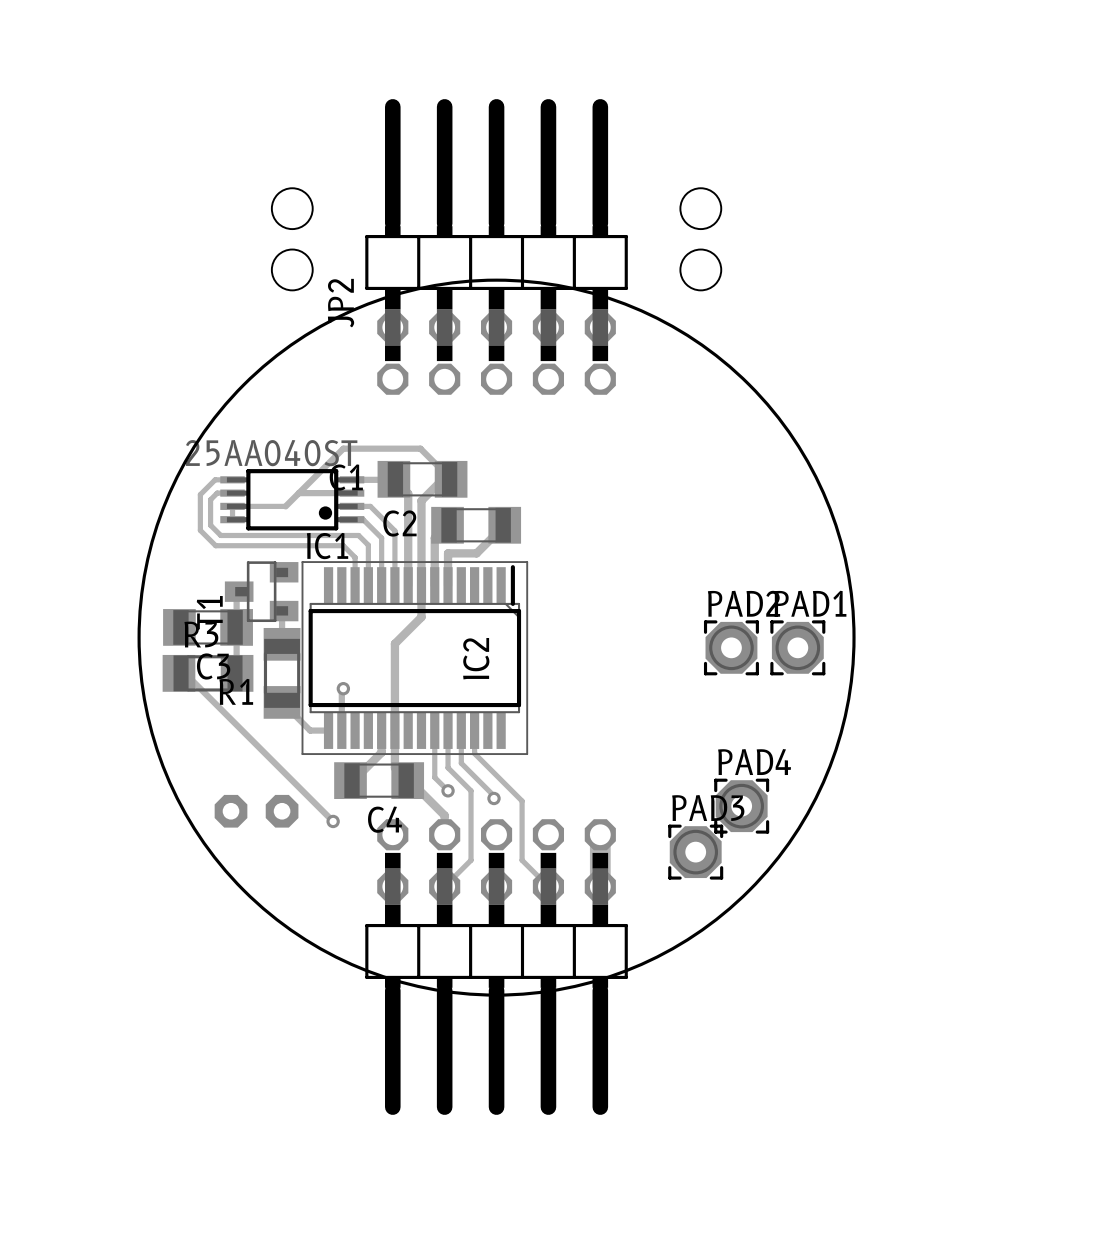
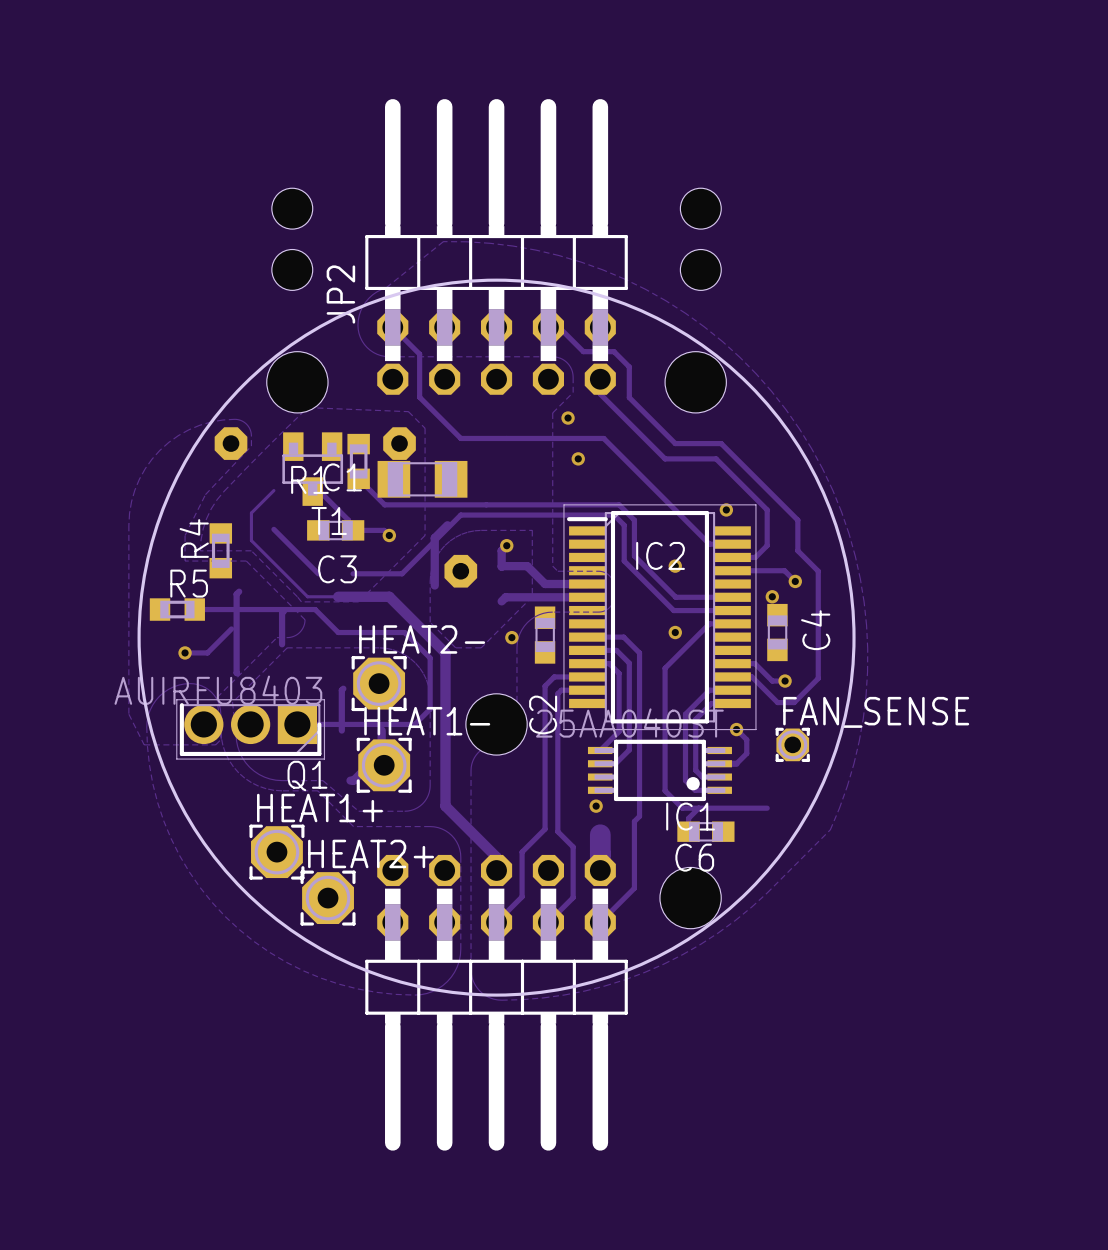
zone outline: none -> (443, 241) (513, 246) (581, 262) (645, 289) (685, 313) (722, 341) (771, 391) (811, 448) (832, 490) (849, 533) (864, 602) (867, 671) (863, 718) (853, 764) (830, 829) (751, 907) (700, 944) (644, 972) (605, 985) (564, 995) (522, 999) (497, 999) (483, 993) (473, 981) (471, 969) (471, 767) (474, 757) (481, 750) (489, 745) (506, 742) (515, 732) (517, 643) (524, 626) (534, 616) (548, 612) (604, 610) (612, 602) (613, 584) (610, 577) (602, 571) (557, 571) (552, 566) (552, 412) (573, 392) (572, 371) (567, 362) (560, 358) (552, 356) (385, 356) (370, 350) (362, 341) (358, 329) (358, 320) (365, 301) (443, 241)
track: none -> (392, 327) (419, 354) (419, 397) (460, 438) (603, 438) (709, 544) (732, 544)
track: none -> (548, 327) (559, 327) (583, 351) (614, 351) (629, 366) (629, 397) (675, 443) (721, 443) (797, 520) (797, 550) (818, 571) (818, 678) (794, 702) (777, 702) (751, 676) (732, 676)
track: none -> (600, 379) (600, 394) (665, 458) (716, 458) (767, 509) (767, 545) (755, 557) (732, 557)
hole: none -> (297, 382)
hole: none -> (695, 382)
zone outline: none -> (307, 407) (217, 499) (206, 518) (200, 550) (251, 550) (301, 601) (358, 601) (425, 535) (425, 428) (408, 411) (307, 407)
via: none -> (568, 418)
zone outline: none -> (234, 419) (243, 421) (249, 427) (251, 446) (205, 494) (185, 535) (185, 561) (246, 561) (305, 619) (304, 624) (301, 630) (294, 636) (276, 637) (217, 697) (221, 739) (215, 744) (144, 744) (128, 714) (128, 525) (131, 501) (145, 468) (168, 442) (199, 425) (234, 419)
part: none -> (231, 443)
part: none -> (399, 443)
via: none -> (578, 458)
track: none -> (358, 478) (384, 504) (619, 504) (634, 520) (634, 555) (675, 597) (732, 597)
track: (232, 479) (215, 479) (200, 494) (200, 530) (215, 545) (343, 545) (355, 557) (355, 585) -> none
track: (352, 479) (393, 479) (408, 493) (408, 585) -> none
track: none -> (273, 490) (251, 513) (251, 540) (307, 596) (389, 596) (445, 652) (445, 806) (496, 857) (496, 870)
track: none -> (312, 491) (319, 491) (348, 520) (348, 525) (353, 530) (384, 530) (389, 535)
track: (232, 493) (217, 493) (210, 499) (210, 525) (220, 535) (358, 535) (368, 545) (368, 585) -> none
track: (298, 493) (352, 493) -> none
IC1 position: (292, 499) -> (659, 770)
track: (352, 506) (370, 506) (394, 530) (394, 585) -> none
C2 footprint: [431, 506, 522, 544] -> [534, 606, 556, 664]
via: none -> (726, 509)
track: (232, 519) (232, 506) (285, 506) (343, 448) (420, 448) (451, 479) (442, 479) (421, 500) (421, 617) (394, 643) (394, 767) (444, 815) (444, 834) -> none
track: (352, 519) (363, 519) (381, 538) (381, 585) -> none
C2 name position: C2 (399, 523) -> C2 (543, 714)
track: (504, 525) (476, 553) (448, 553) (448, 585) -> none
track: none -> (273, 529) (318, 573)
zone outline: none -> (481, 530) (468, 532) (450, 540) (437, 555) (431, 568) (430, 622) (455, 647) (481, 647) (532, 596) (532, 530) (481, 530)
via: none -> (389, 535)
track: none -> (506, 545) (501, 550) (501, 566) (527, 566) (545, 584) (587, 584)
via: none -> (506, 545)
R4: none -> (220, 550)
via: none -> (675, 566)
track: none -> (732, 570) (784, 570) (795, 581)
part: none -> (460, 571)
track: none -> (353, 573) (402, 573) (460, 515) (614, 515) (624, 525) (624, 561) (673, 610) (732, 610)
via: none -> (795, 581)
T1 rotation: 0° (261, 591) -> 90° counterclockwise (312, 469)
T1 position: (261, 591) -> (312, 469)
via: none -> (772, 596)
track: none -> (587, 597) (505, 597) (501, 601)
C3 footprint: [163, 609, 253, 646] -> [307, 520, 365, 541]
R5: none -> (177, 609)
track: none -> (194, 609) (315, 609) (338, 632) (404, 632) (430, 658) (430, 709) (414, 724) (297, 724)
track: none -> (732, 623) (709, 623) (665, 668) (665, 790) (682, 808) (767, 808)
R1 footprint: [263, 627, 301, 719] -> [347, 433, 370, 490]
track: none -> (231, 628) (207, 652) (185, 652)
via: none -> (675, 632)
via: none -> (511, 637)
track: none -> (587, 637) (623, 637) (639, 652) (639, 816) (634, 821) (634, 888) (600, 922)
zone outline: none -> (287, 647) (385, 648) (404, 654) (419, 667) (426, 679) (430, 698) (429, 789) (426, 798) (420, 805) (407, 811) (358, 811) (322, 780) (270, 779) (259, 774) (245, 762) (237, 746) (232, 702) (287, 647)
PAD2: (731, 647) -> none
PAD1: (797, 647) -> none
track: none -> (587, 650) (616, 650) (629, 663) (629, 749) (615, 763) (600, 763)
via: none -> (185, 652)
IC2 rotation: 0° (414, 658) -> 90° counterclockwise (659, 617)
IC2 position: (414, 658) -> (659, 617)
track: none -> (587, 663) (609, 663) (619, 673) (619, 731) (600, 750)
track: none -> (732, 663) (754, 663) (772, 681) (785, 681)
track: (178, 673) (185, 673) (333, 821) -> none
R3: (208, 673) -> none
via: none -> (785, 681)
zone outline: none -> (190, 683) (205, 687) (216, 698) (220, 710) (221, 737) (225, 753) (233, 766) (251, 782) (274, 790) (317, 790) (353, 826) (434, 826) (445, 830) (454, 838) (458, 845) (460, 857) (460, 955) (454, 972) (442, 985) (432, 991) (420, 994) (395, 994) (357, 988) (321, 978) (286, 962) (254, 941) (212, 902) (179, 855) (163, 820) (152, 783) (147, 746) (147, 721) (155, 700) (173, 686) (190, 683)
HEAT2-: none -> (379, 683)
via: (343, 688) -> none
track: none -> (587, 690) (561, 690) (557, 693) (557, 831) (573, 847) (573, 897) (548, 922)
track: none -> (732, 690) (709, 690) (685, 714) (685, 780) (695, 790) (719, 790)
track: (282, 702) (310, 730) (328, 730) -> none
track: none -> (732, 703) (711, 703) (695, 719) (695, 770) (702, 777) (719, 777)
hole: none -> (496, 724)
Q1: none -> AUIRFU8403 (250, 729)
track: none -> (736, 729) (746, 739) (746, 753) (736, 763) (719, 763)
via: none -> (736, 729)
track: (434, 730) (434, 777) (448, 790) -> none
track: (448, 730) (448, 767) (471, 790) (471, 860) (444, 886) -> none
track: (461, 730) (461, 763) (494, 795) (494, 798) -> none
track: (474, 730) (474, 753) (522, 801) (522, 852) -> (587, 676) (554, 676) (545, 686) (545, 829) (522, 852)
FAN_SENSE: none -> (792, 744)
C4 footprint: [334, 762, 425, 800] -> [767, 603, 788, 662]
HEAT1-: none -> (384, 765)
via: (448, 790) -> none
via: (494, 798) -> none
via: none -> (596, 806)
PAD4: (741, 806) -> none
track: none -> (698, 808) (688, 818) (688, 831)
part: (231, 811) -> none
part: (282, 811) -> none
C4 name position: C4 (384, 819) -> C4 (815, 630)
via: (333, 821) -> none
C6: none -> (705, 831)
HEAT1+: none -> (276, 852)
PAD3: (695, 852) -> none
track: (522, 860) (548, 886) -> (522, 860) (522, 896) (496, 922)
HEAT2+: none -> (328, 898)
hole: none -> (690, 898)
part position: (496, 967) -> (496, 1002)

